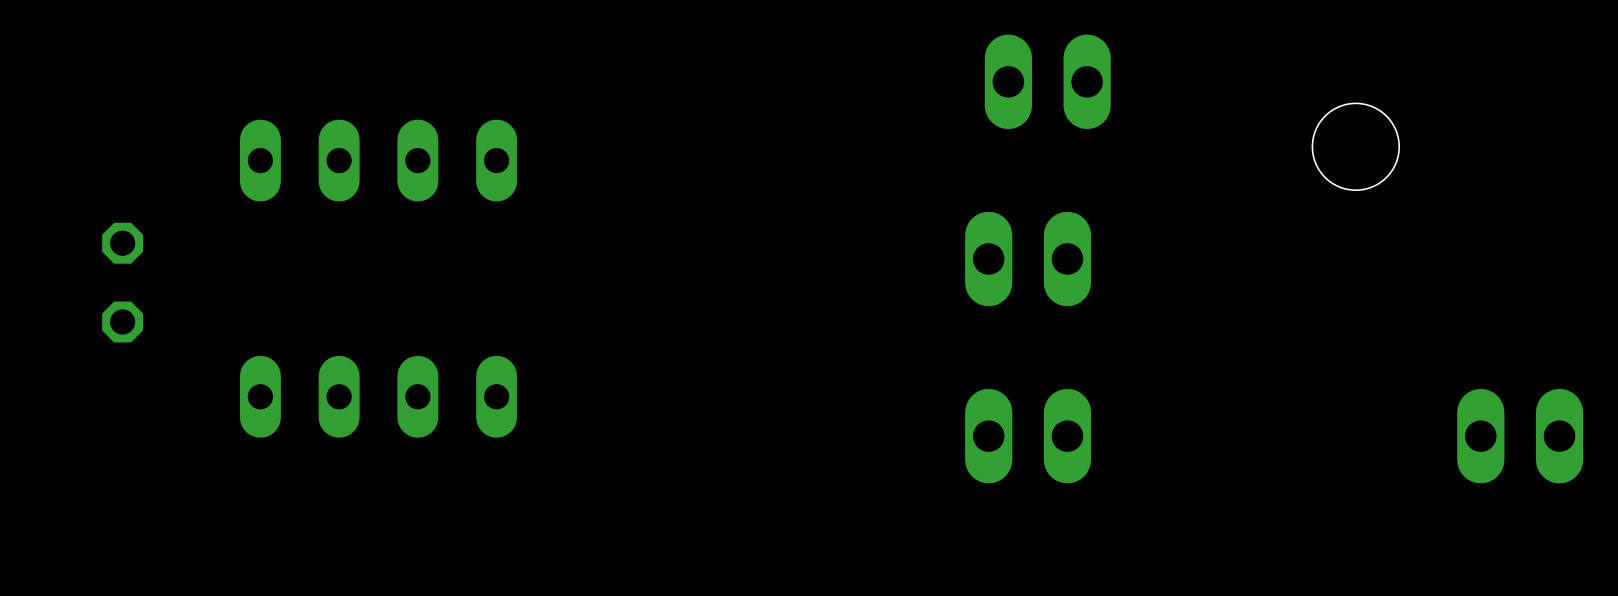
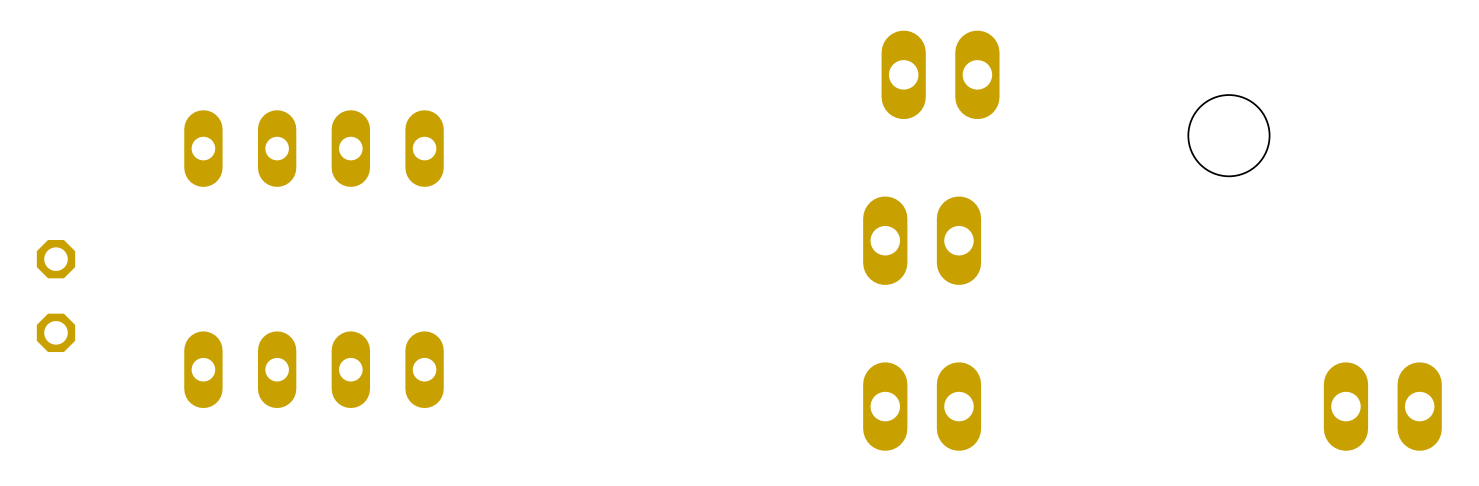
part position: (122, 282) -> (55, 296)

